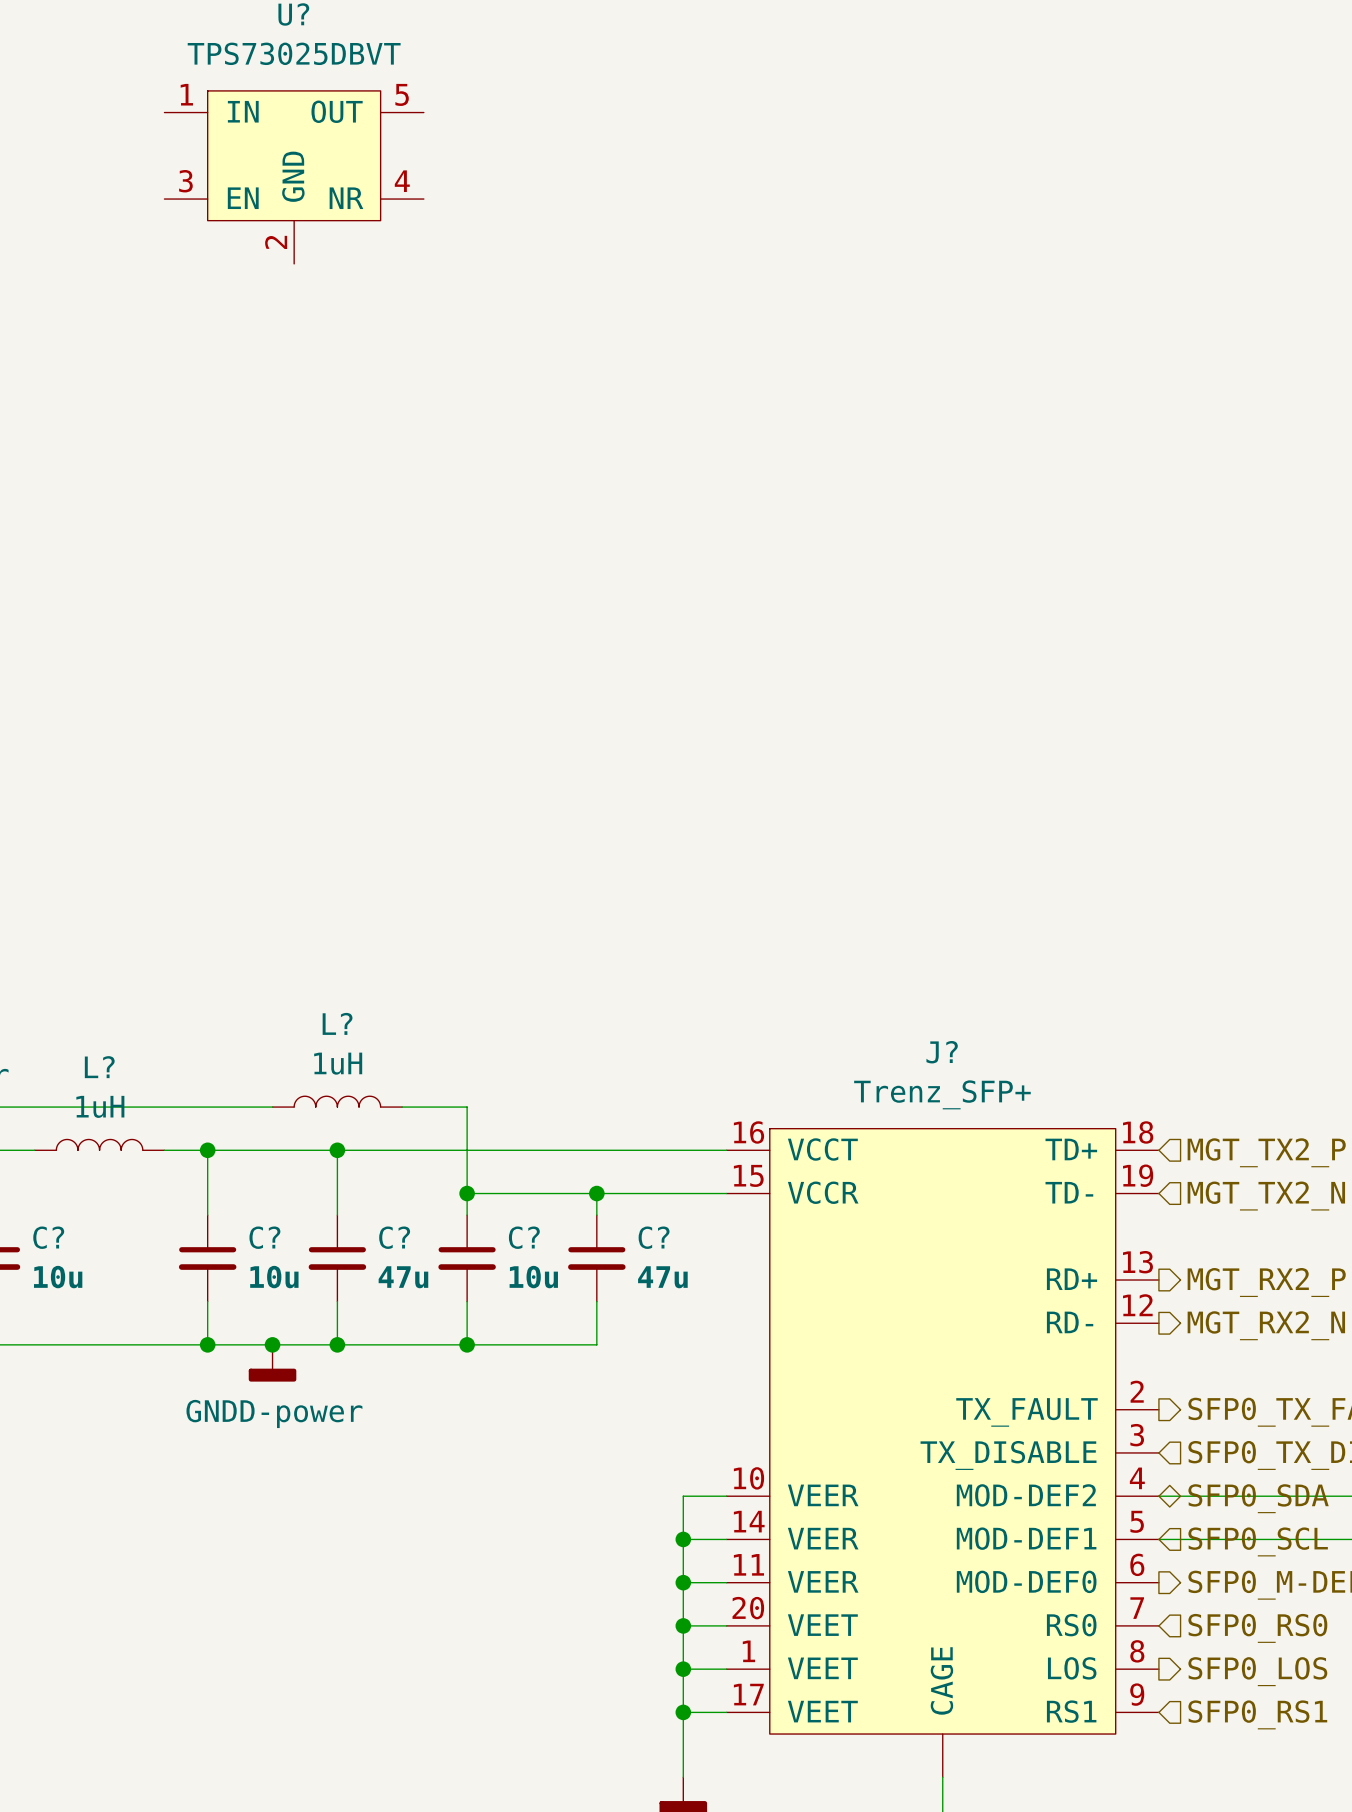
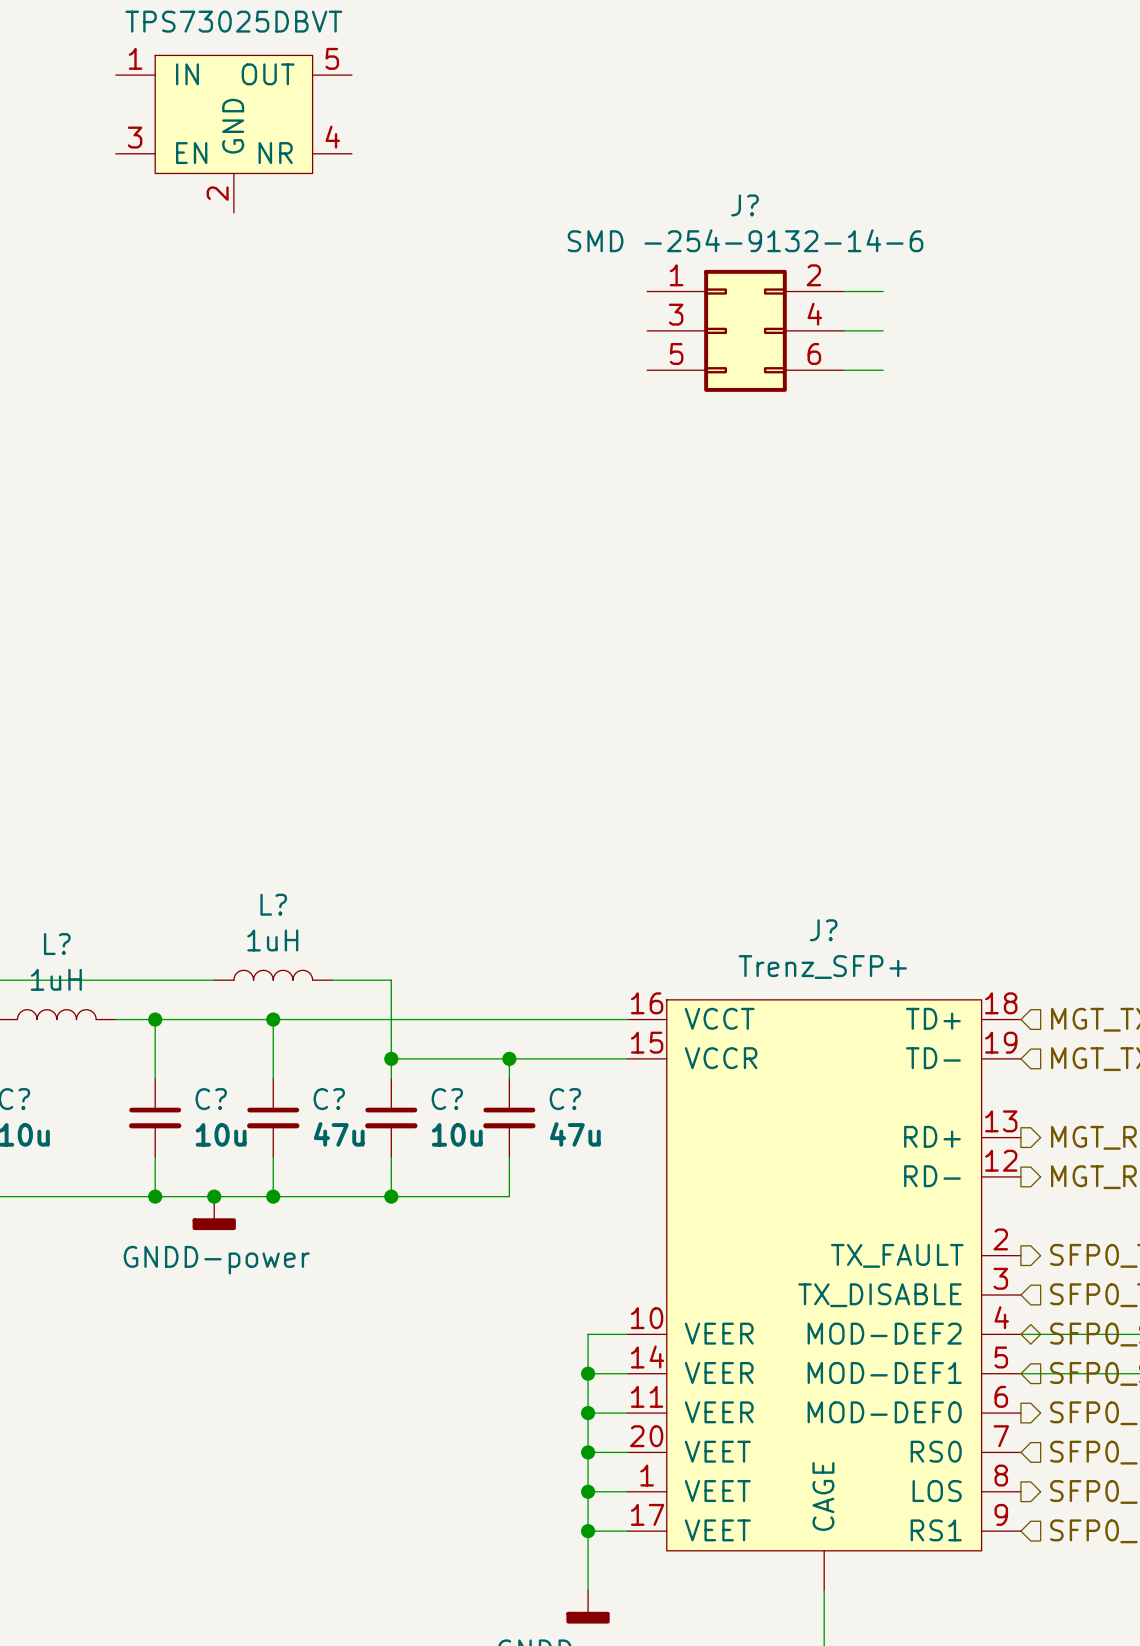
wire: none -> (843, 291) (883, 291)
J?: none -> SMD -254-9132-14-6 (745, 330)
wire: none -> (843, 330) (883, 330)
wire: none -> (843, 370) (883, 370)

